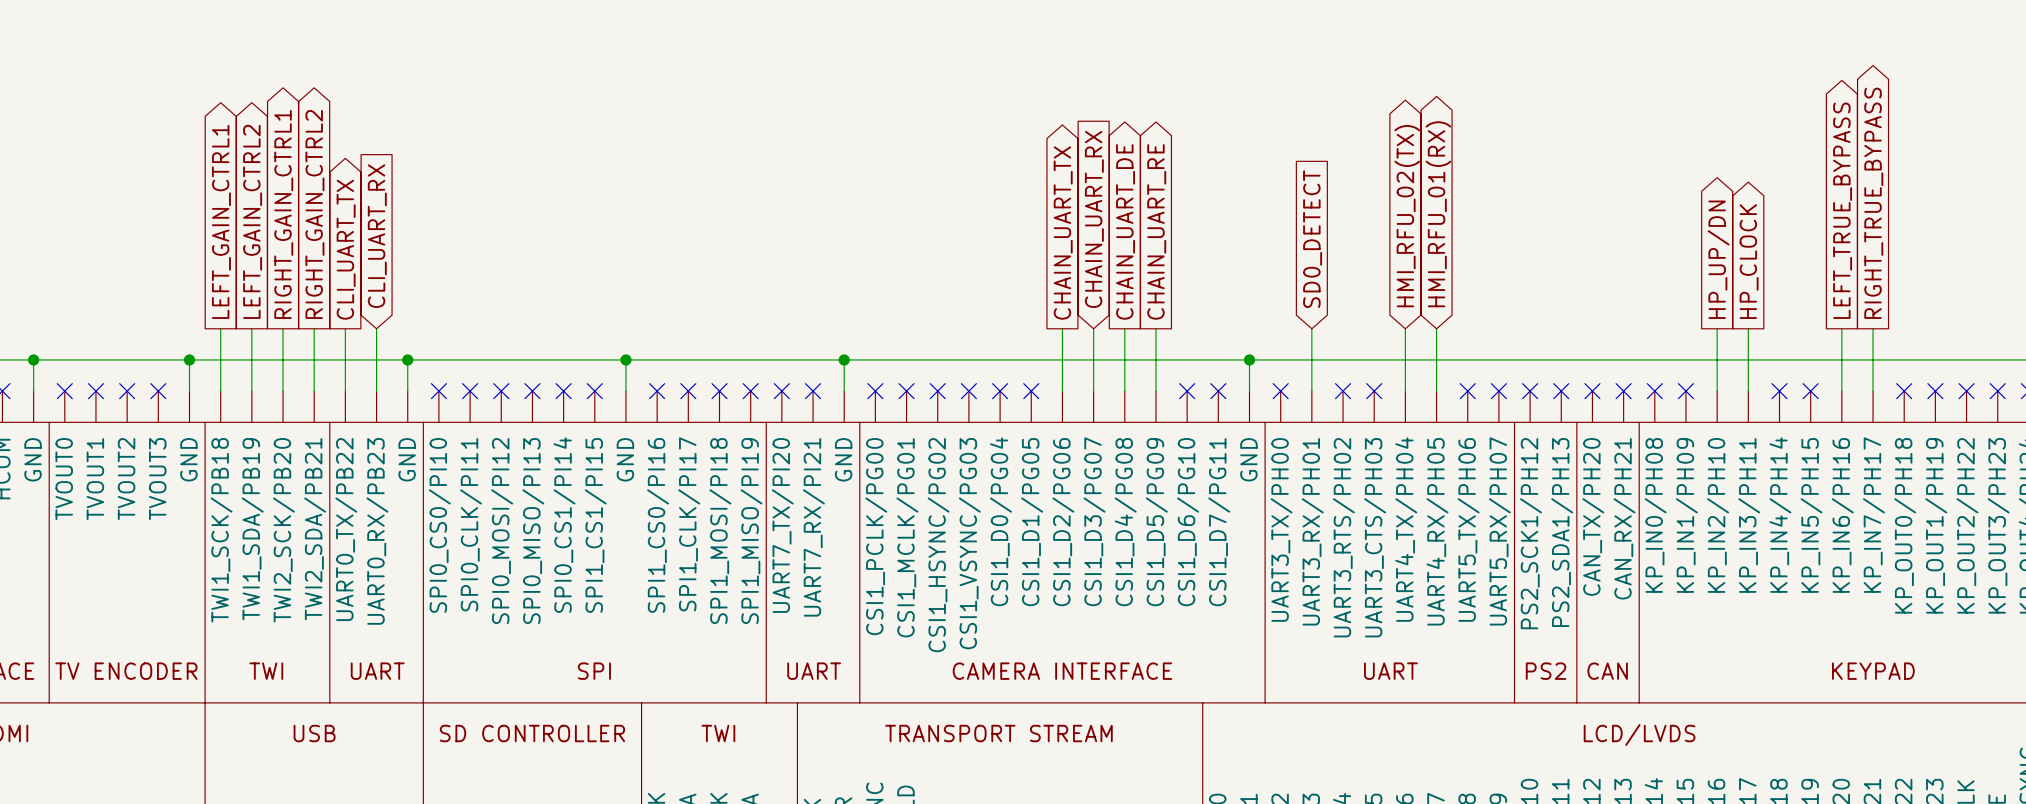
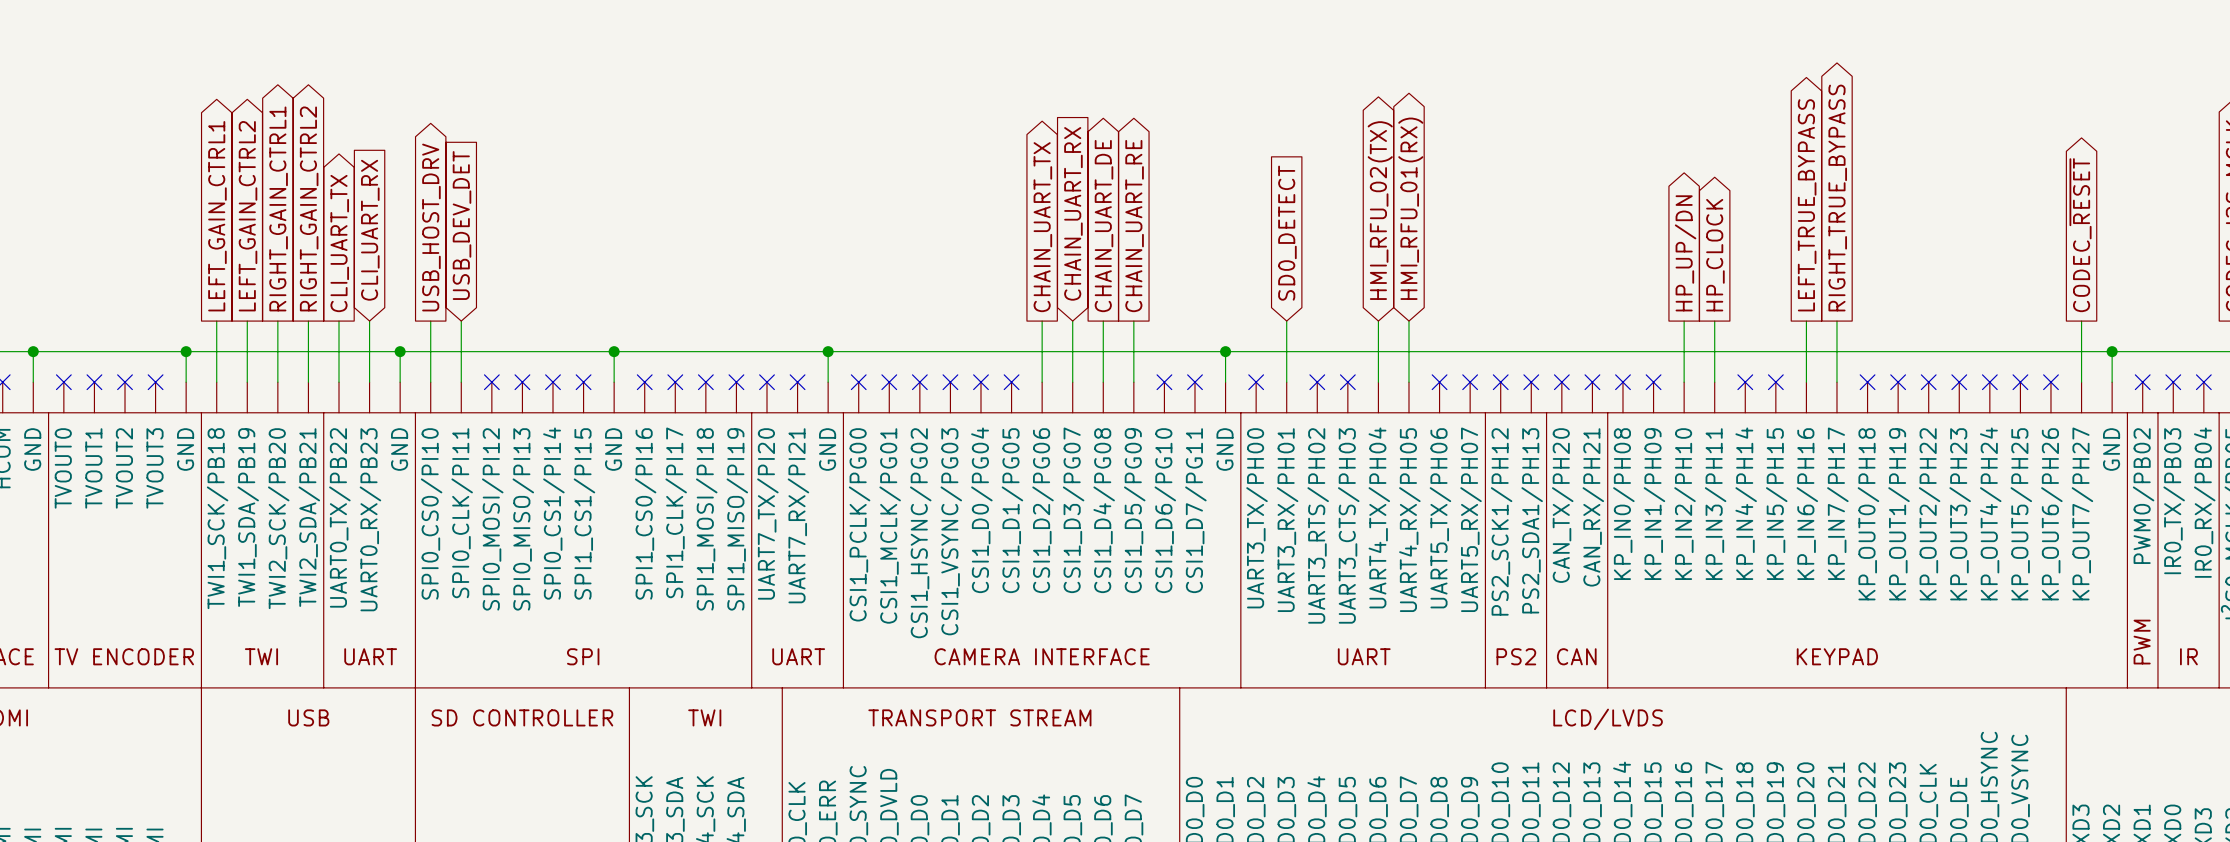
global label: none -> USB_DEV_DET (462, 225)
global label: none -> USB_HOST_DRV (431, 227)
wire: none -> (430, 321) (430, 382)
wire: none -> (461, 321) (461, 382)
no-connect mark: (438, 391) -> none
no-connect mark: (470, 391) -> none

